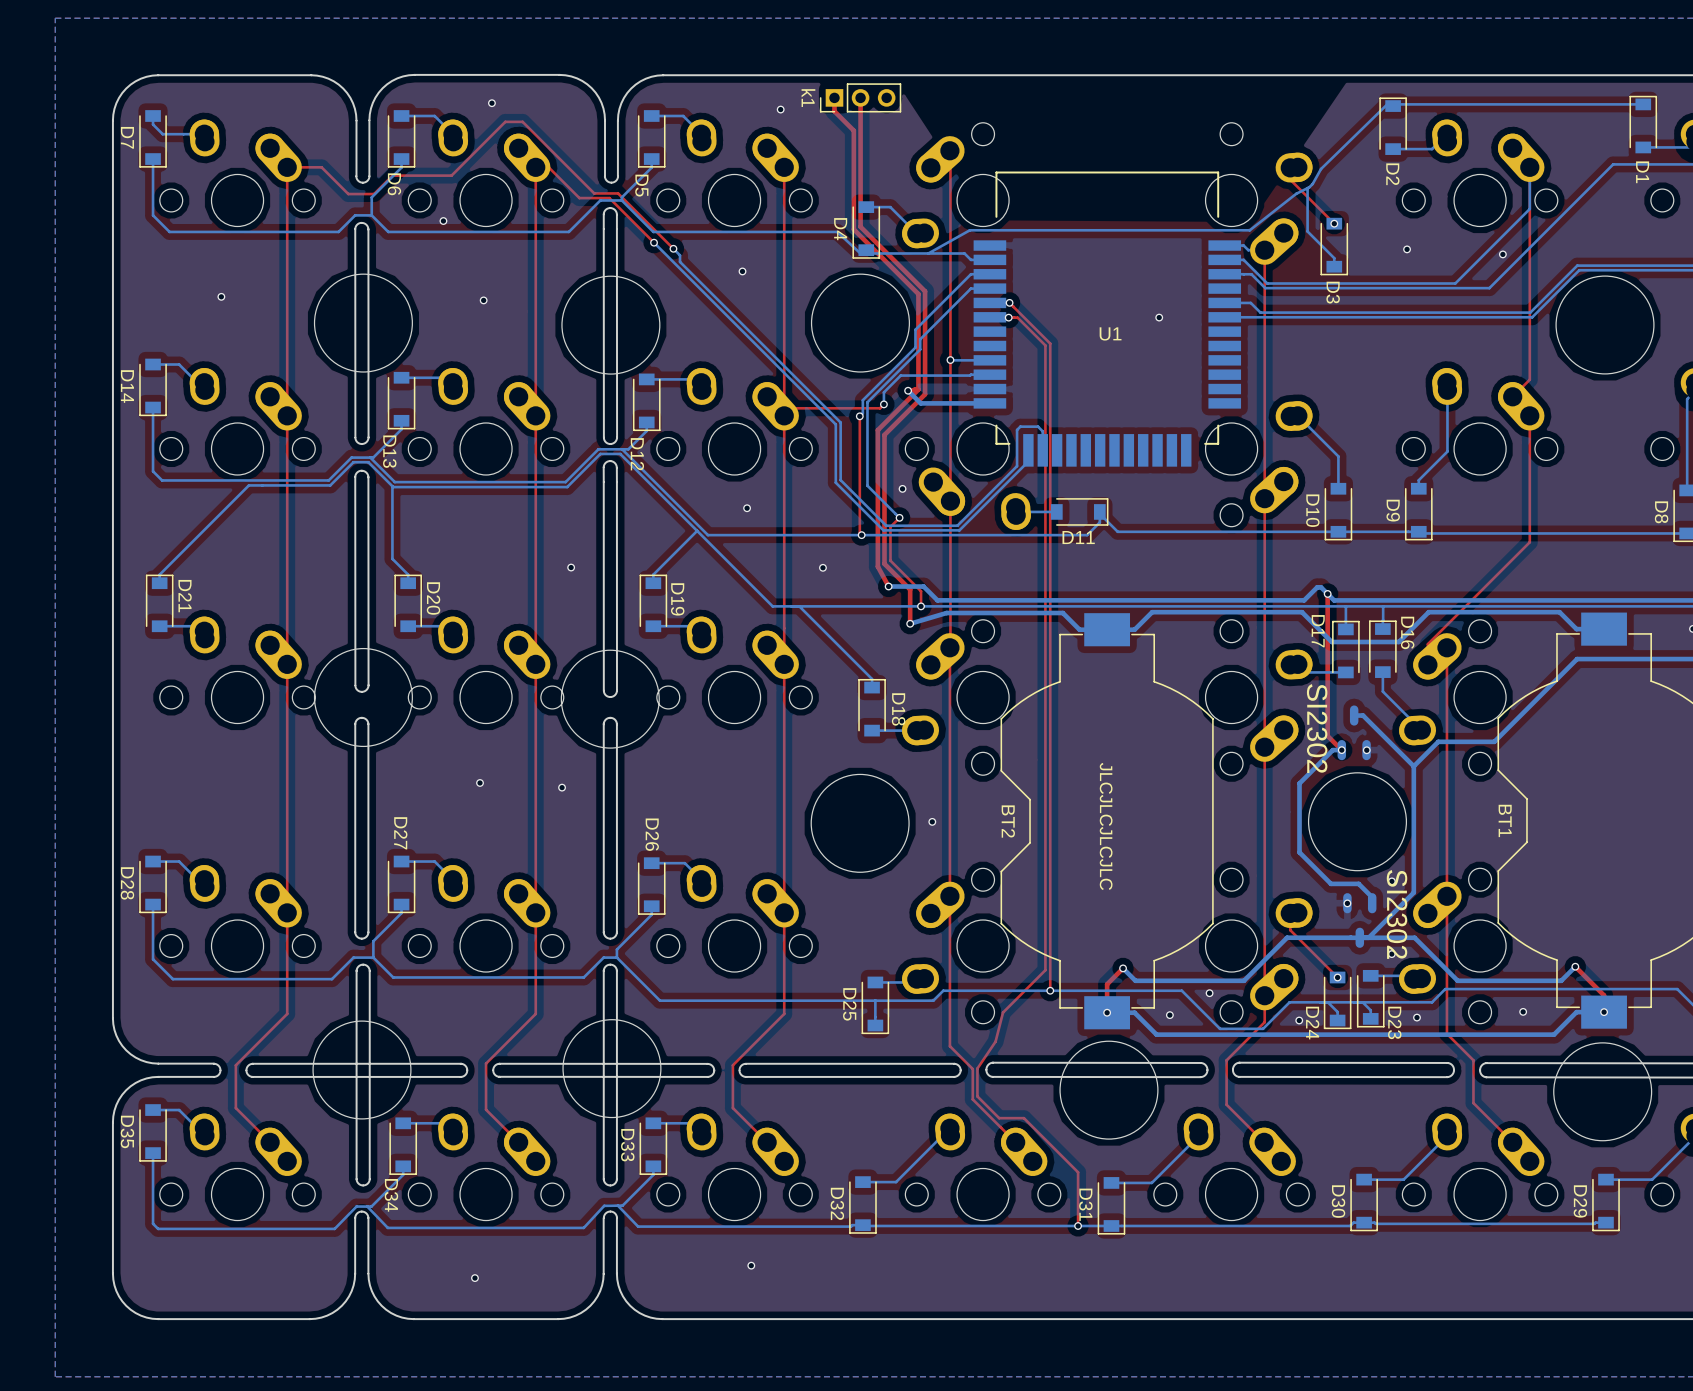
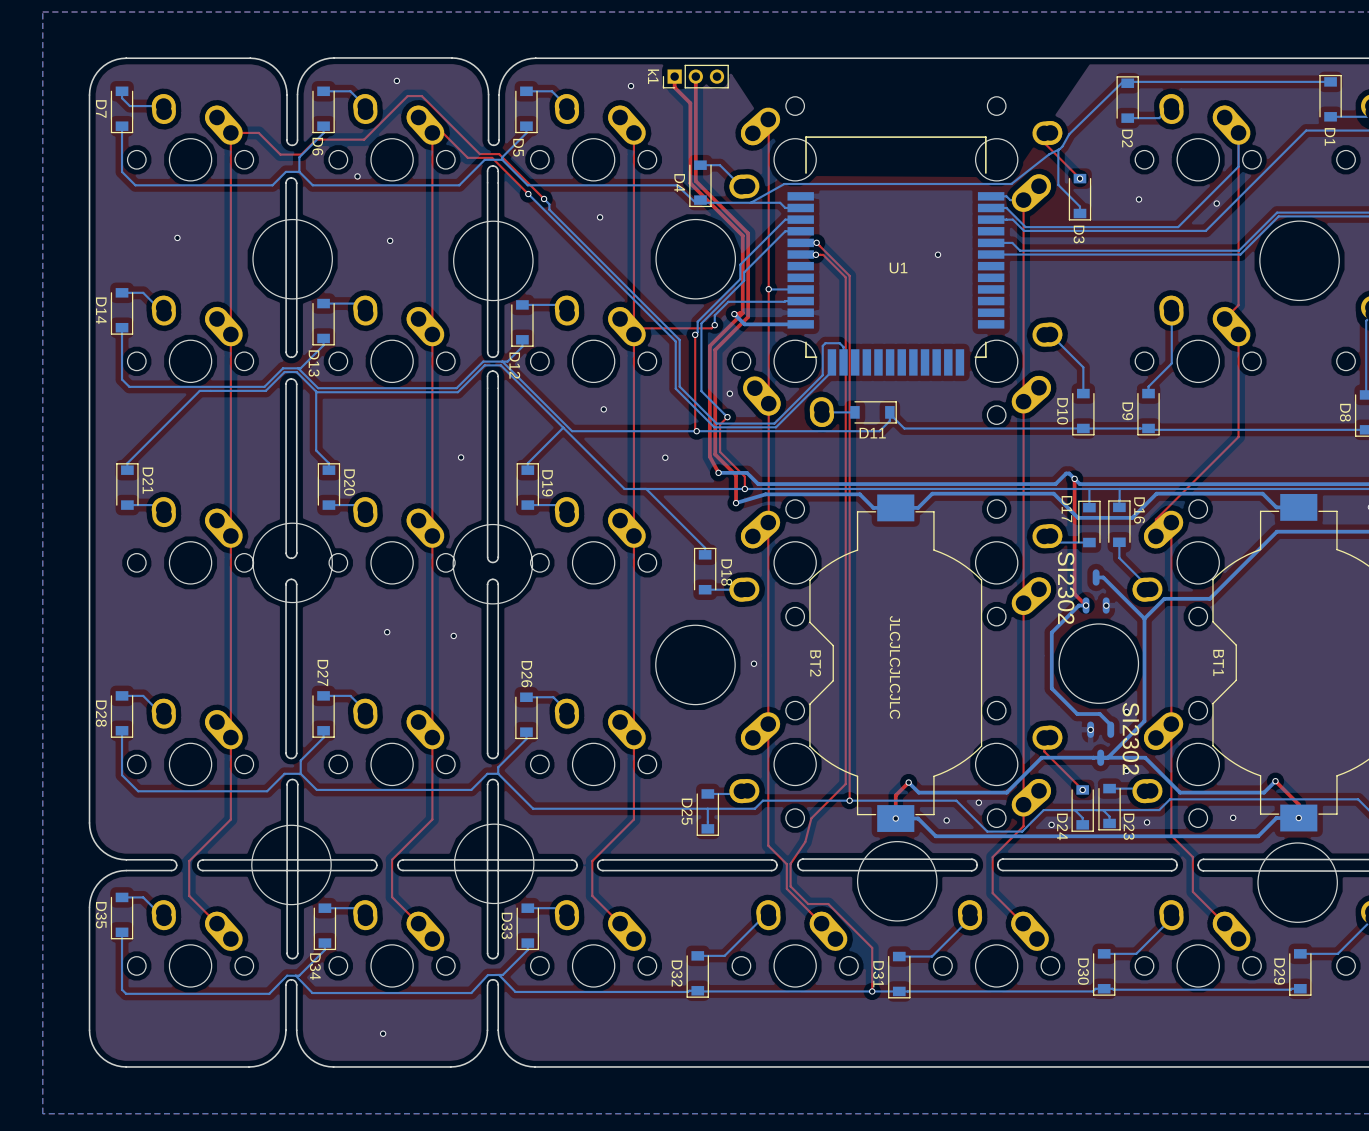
via: (751, 1265) -> none

